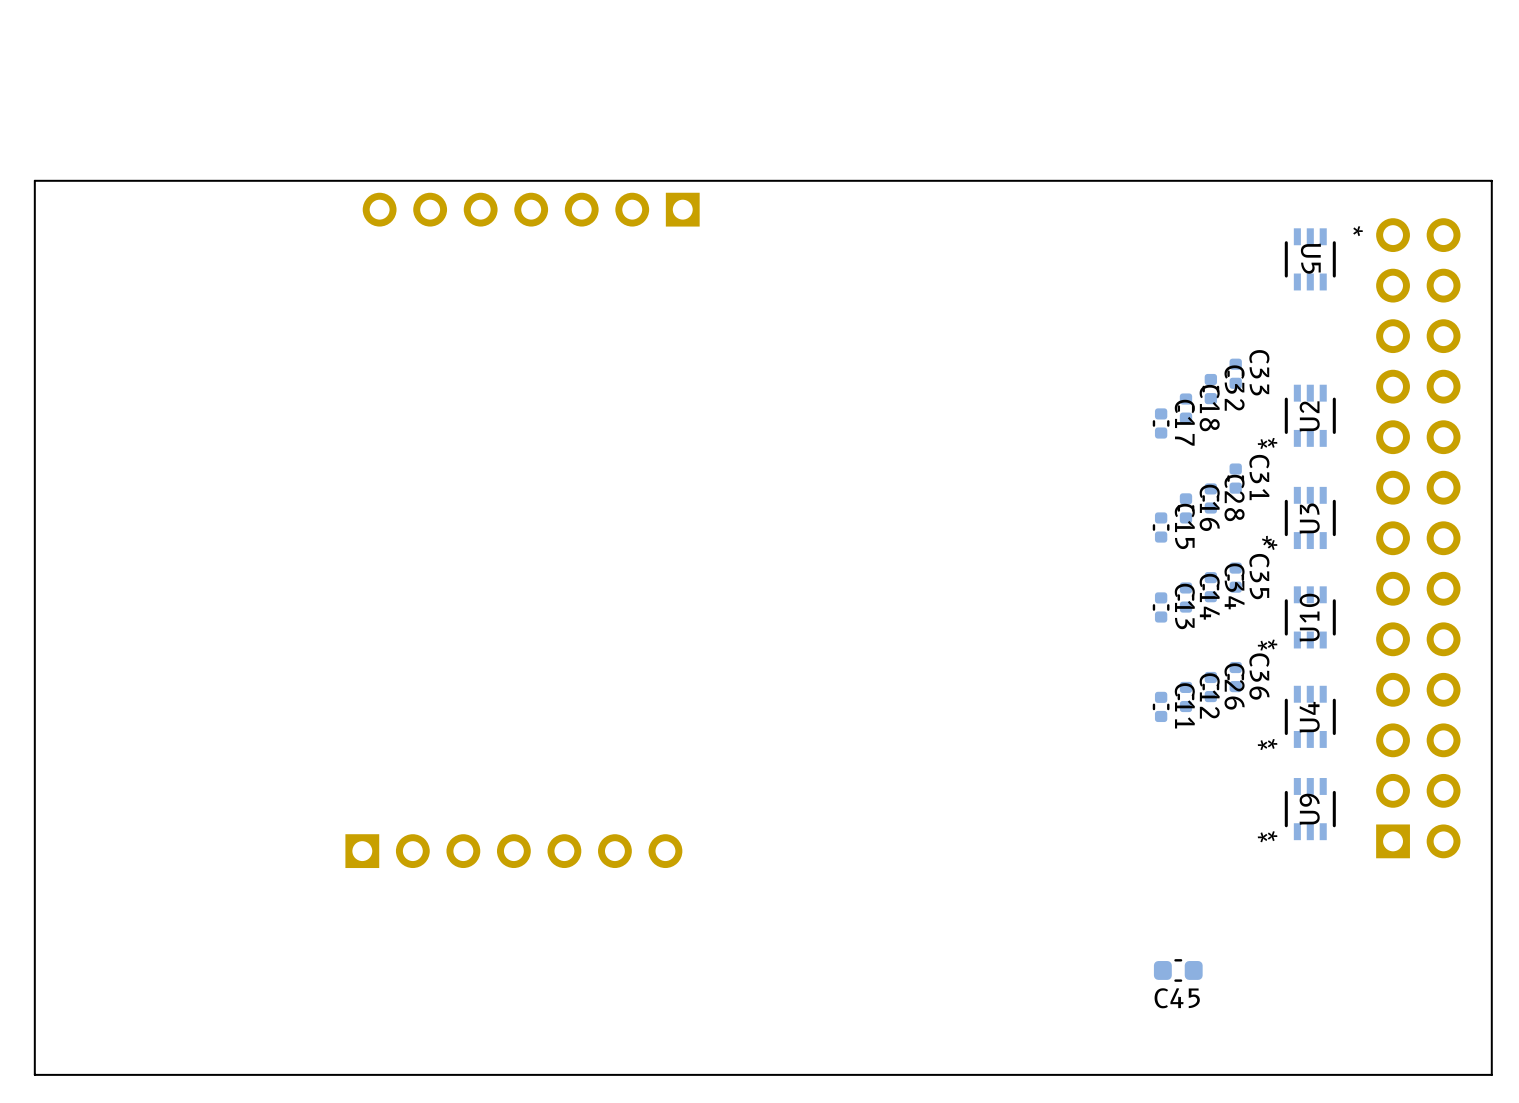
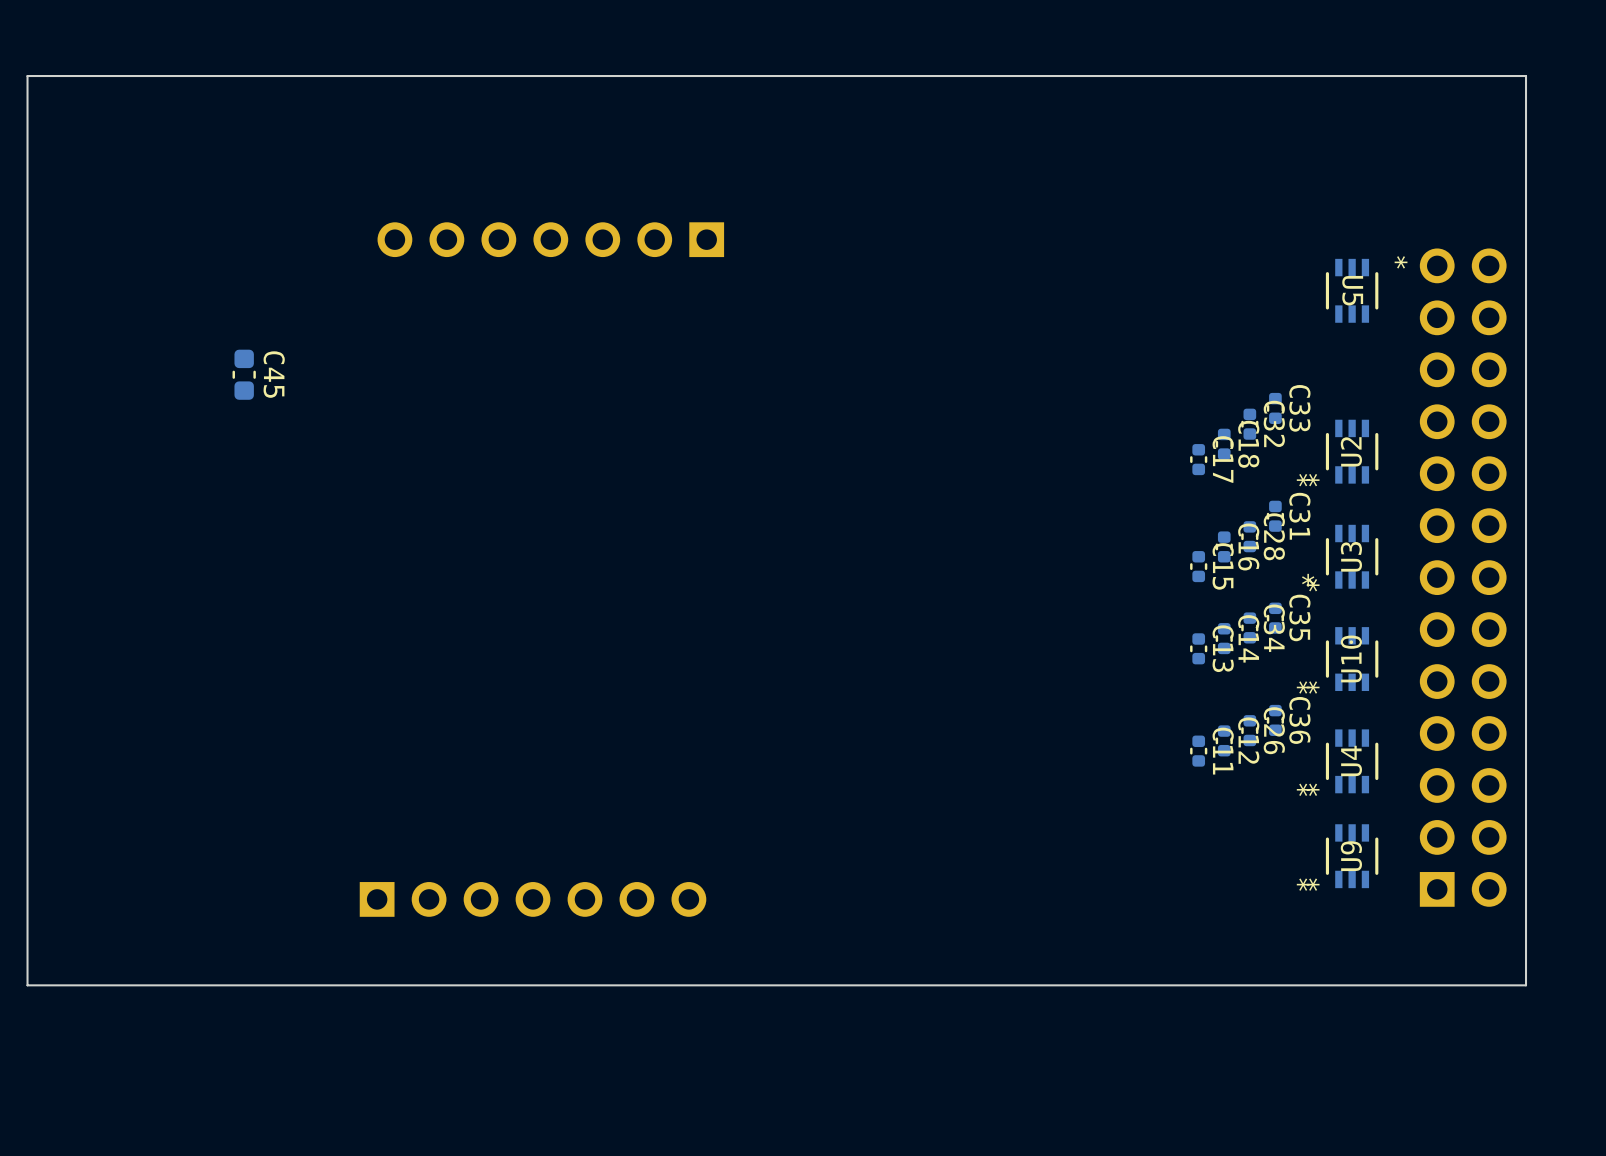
board edge: (1491, 180) (34, 180) (34, 1074) (1491, 1074) (1491, 180) -> (1526, 76) (1526, 985) (27, 985) (27, 76) (1526, 76)
C45 rotation: 0° (1178, 970) -> 90° clockwise (244, 374)
C45 position: (1178, 970) -> (244, 374)
C45 name position: C45 (1177, 998) -> C45 (274, 374)

